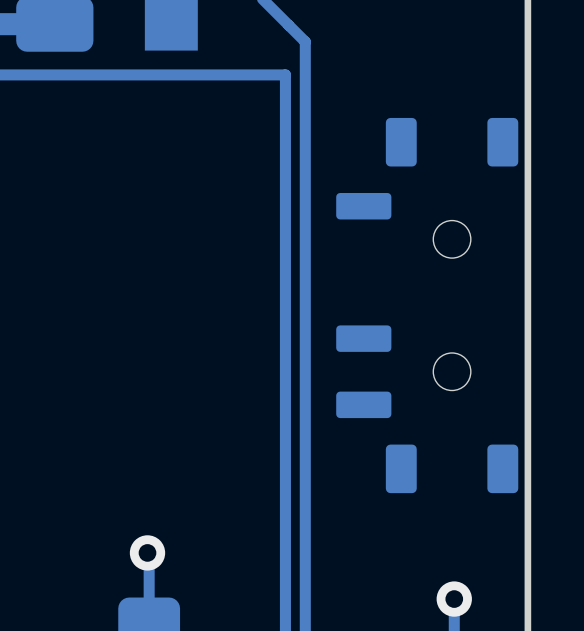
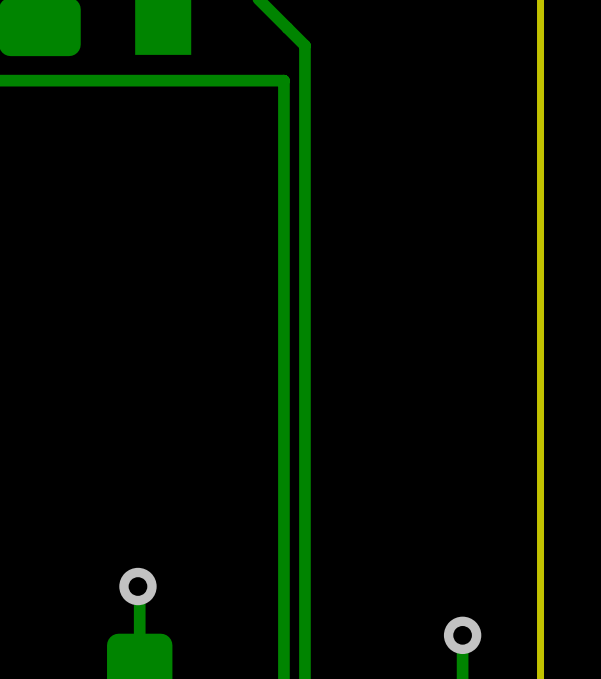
part: (427, 305) -> none

